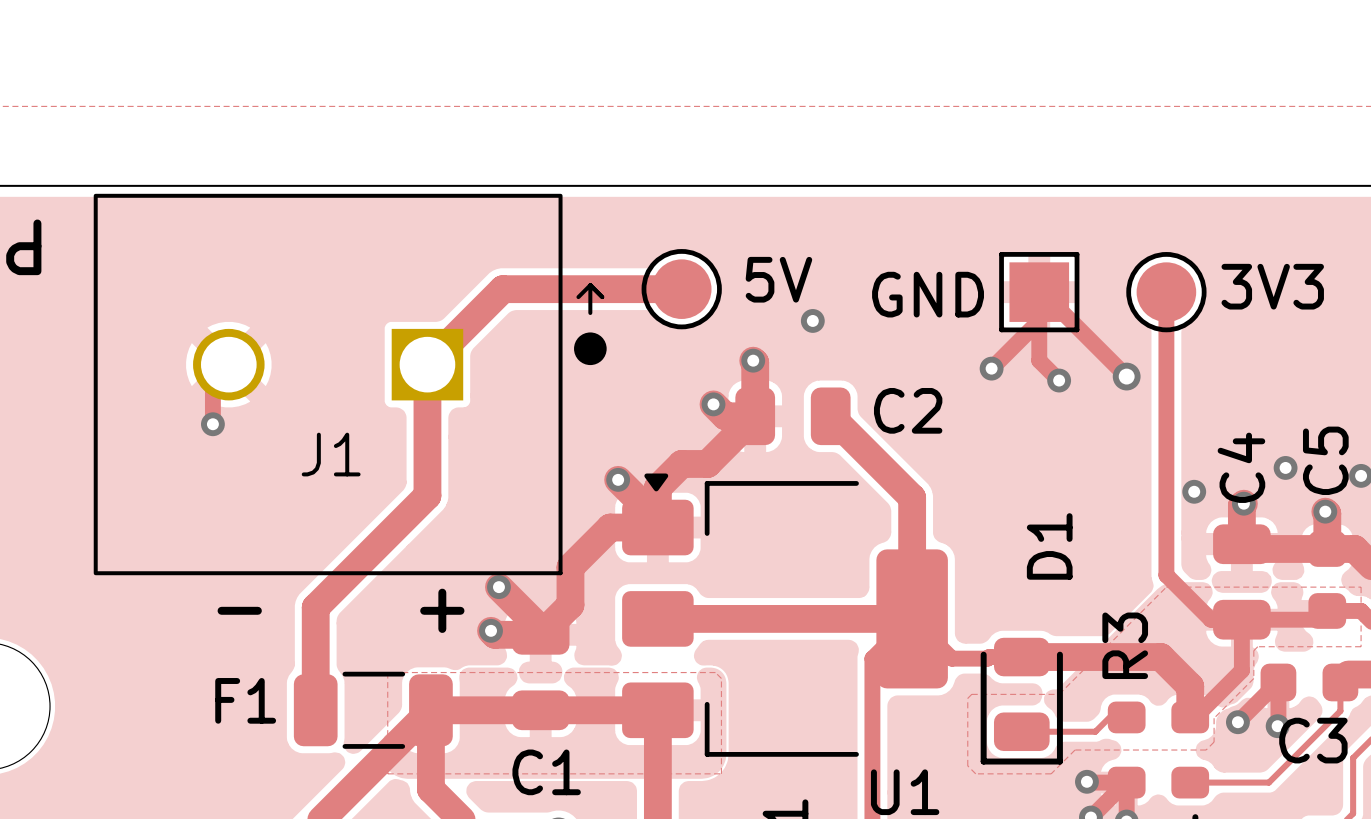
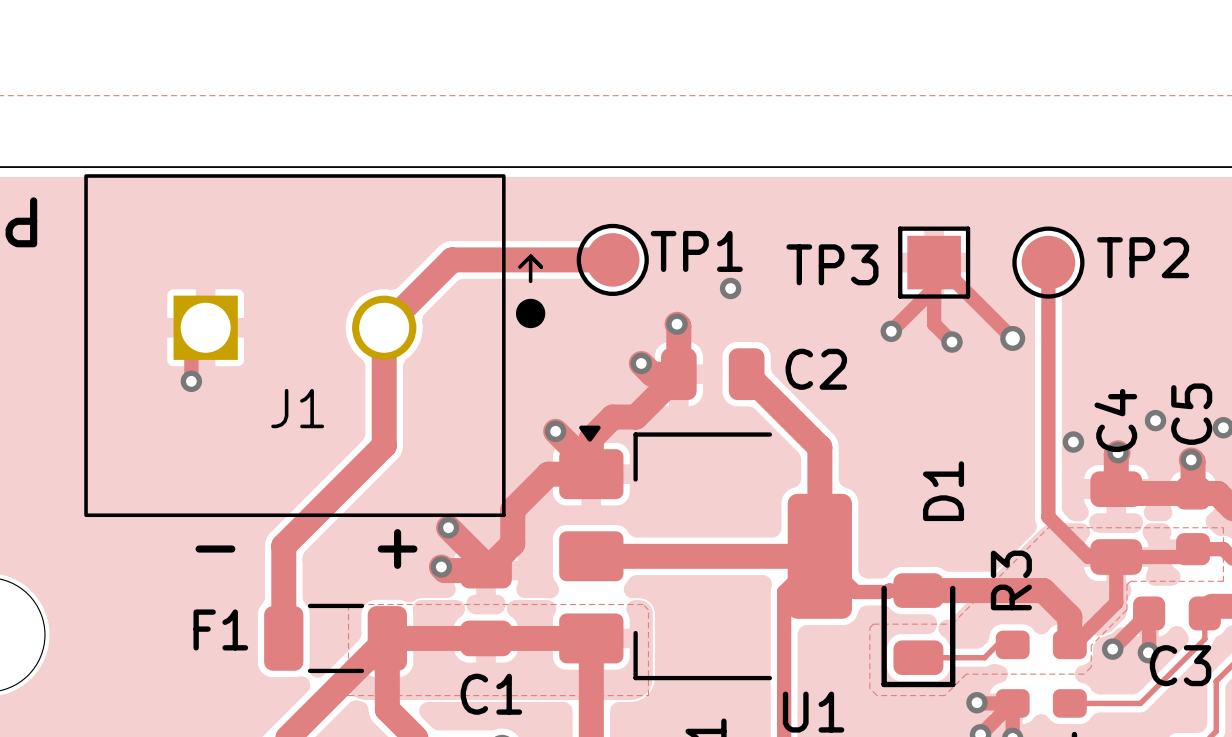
J1 footprint: [93, 193, 607, 576] -> [84, 174, 546, 518]
5V name: 5V (778, 279) -> TP1 (696, 251)
3V3 name: 3V3 (1272, 286) -> TP2 (1143, 257)
GND name: GND (928, 294) -> TP3 (832, 264)

